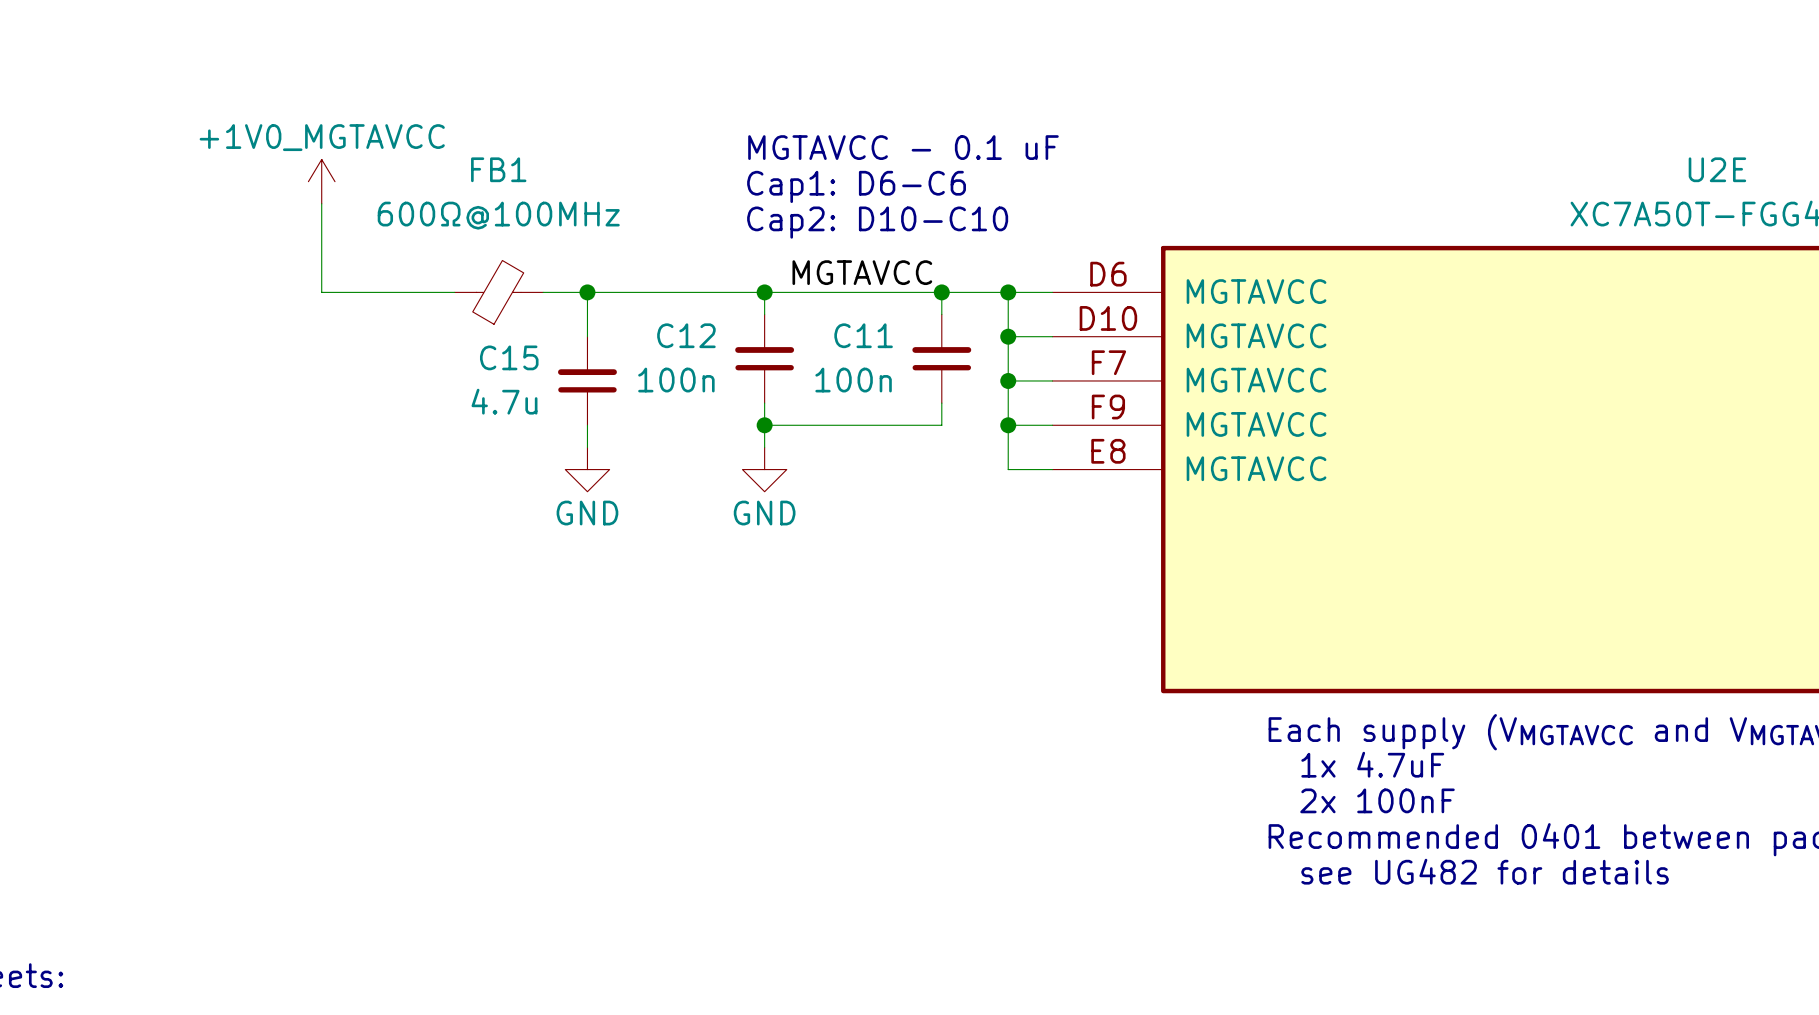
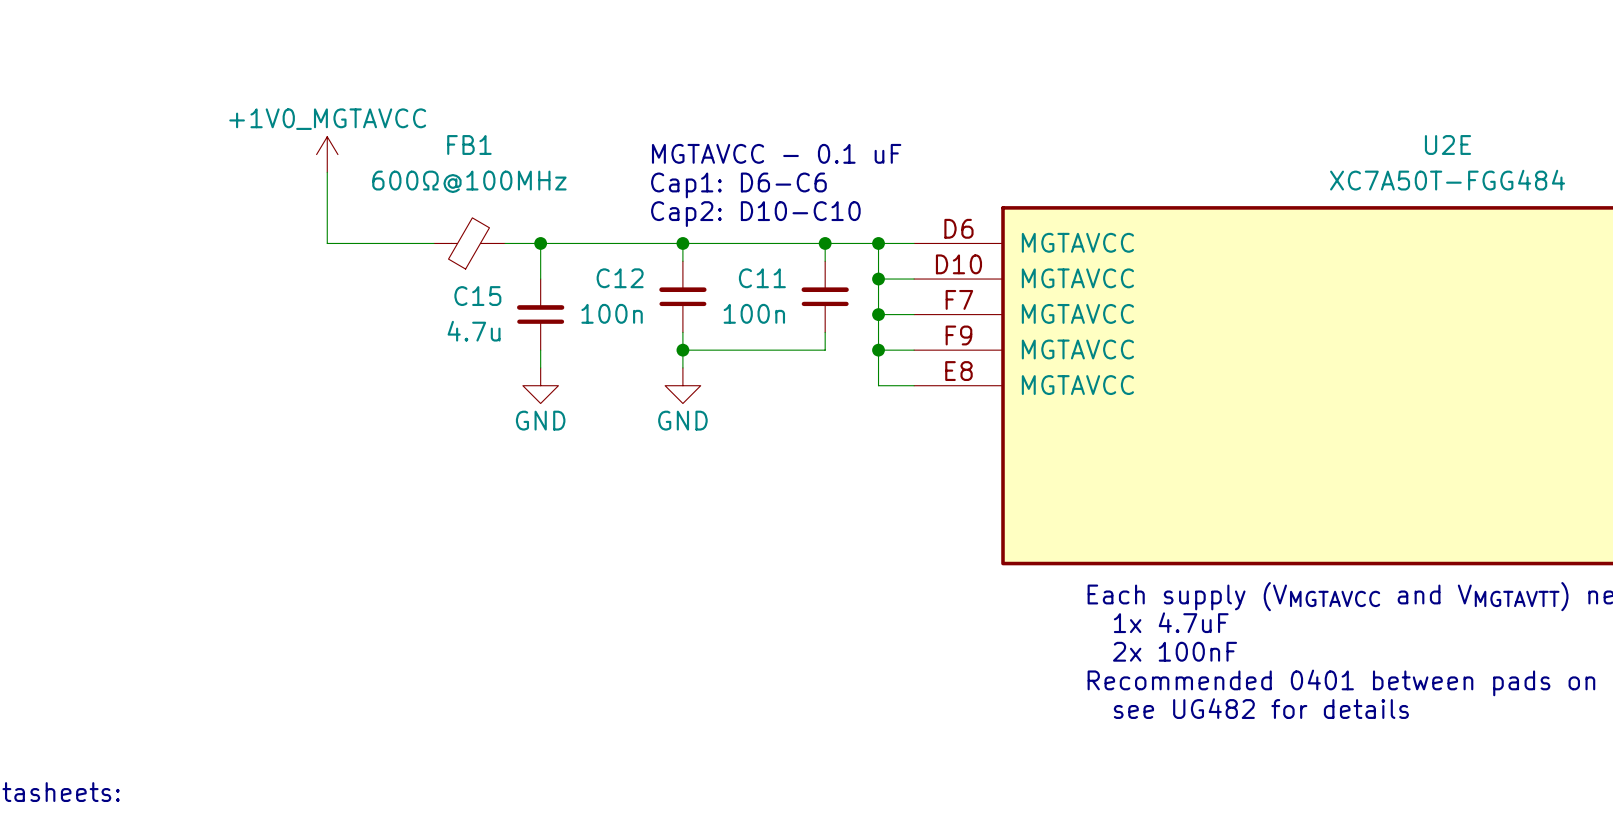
text position: MGTAVCC - 0.1 uF (903, 147) -> MGTAVCC - 0.1 uF (776, 153)
text position: Cap1: D6-C6 (856, 186) -> Cap1: D6-C6 (738, 185)
text position: Cap2: D10-C10 (877, 222) -> Cap2: D10-C10 (755, 214)
label: MGTAVCC (862, 272) -> none

